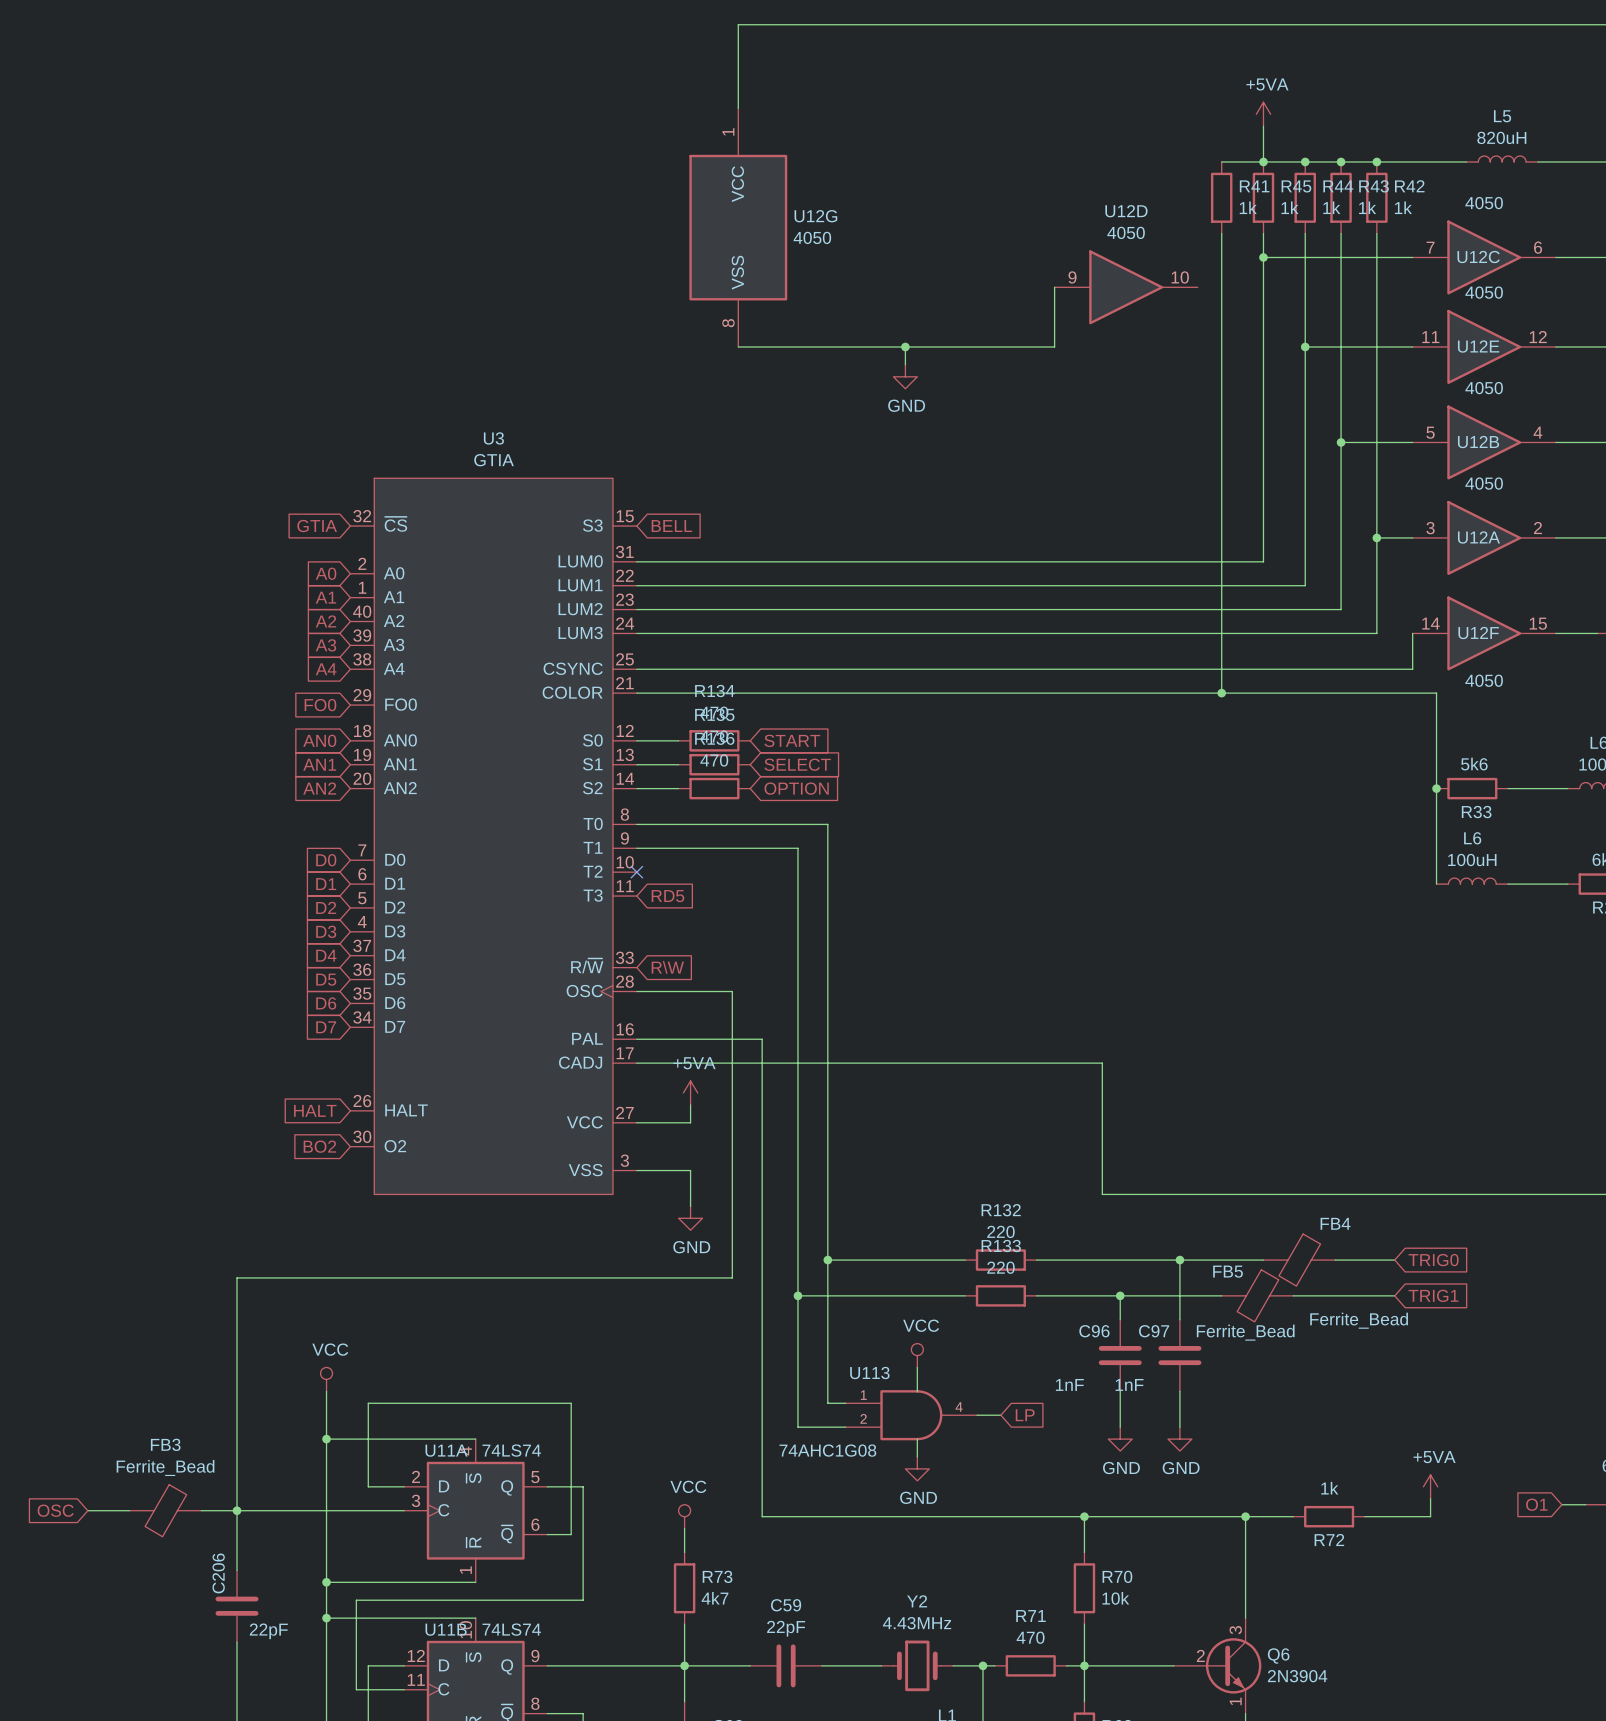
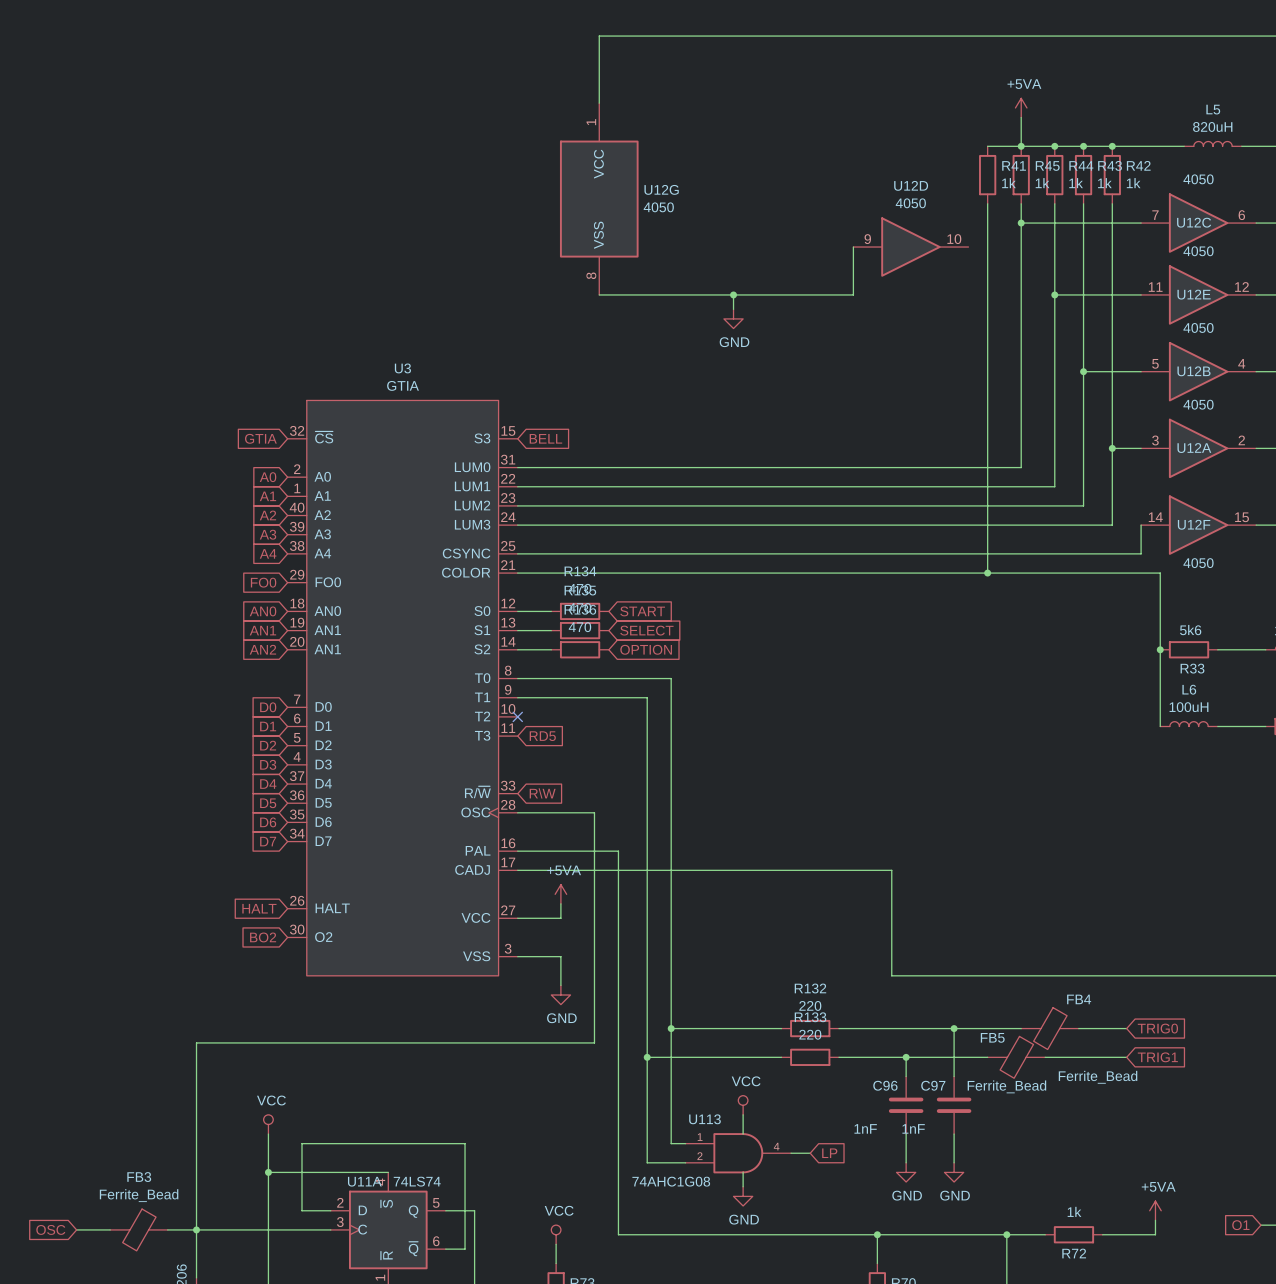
U3 pin name: AN2 (400, 788) -> AN1 (327, 649)

